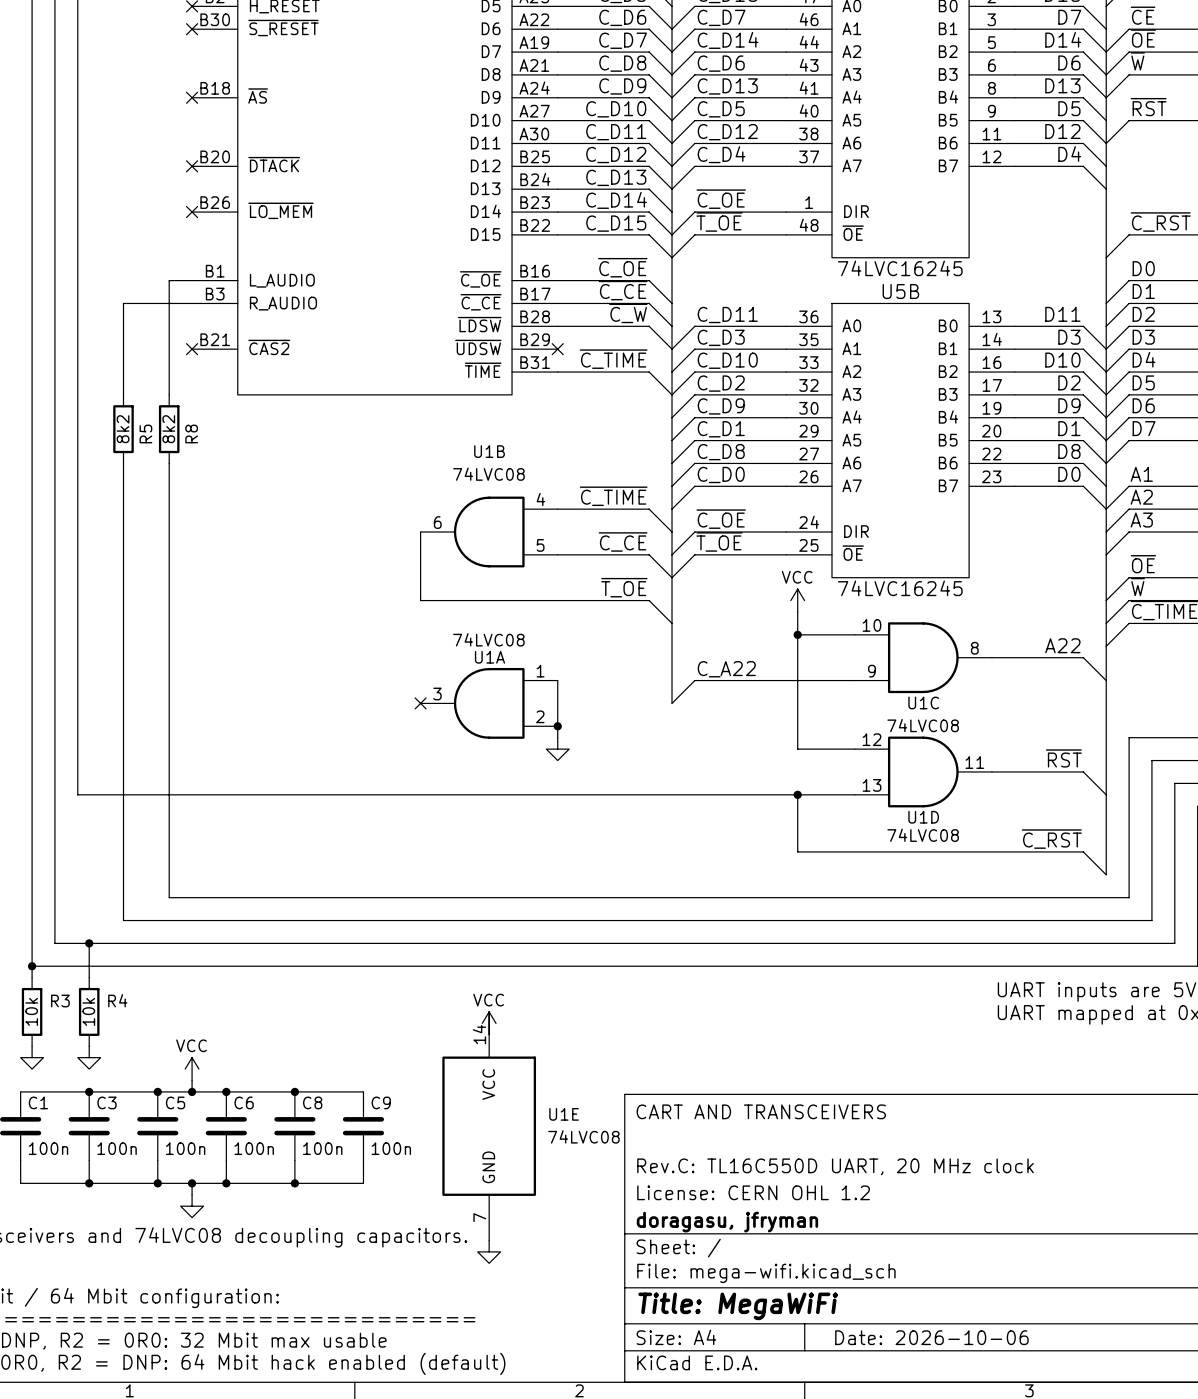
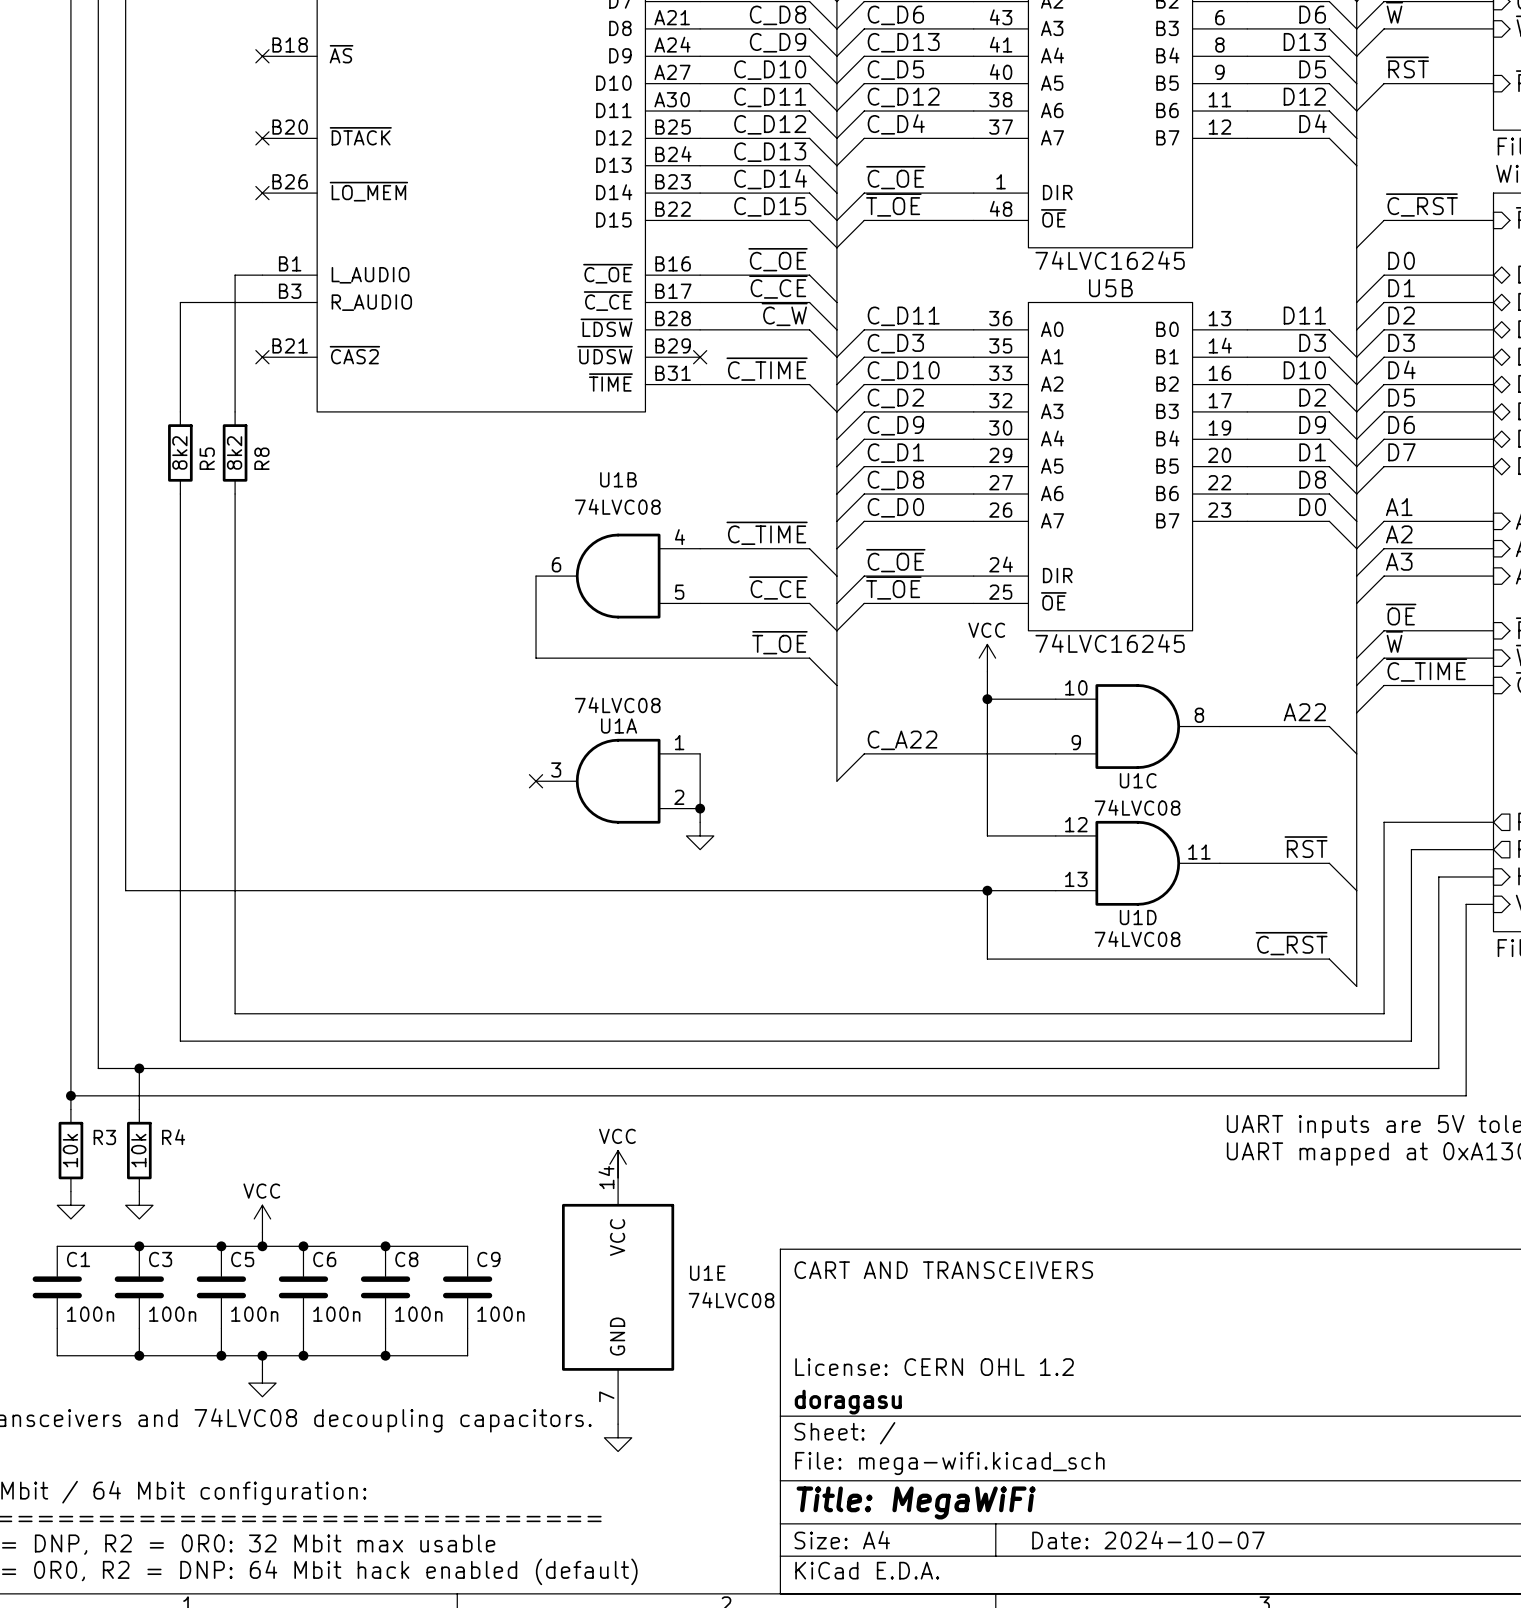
title block: Rev.C: TL16C550D UART, 20 MHz clock (835, 1166) -> none
title block: doragasu, jfryman (727, 1222) -> doragasu (848, 1402)
title block: Date: 2026-10-06 (931, 1337) -> Date: 2024-10-07 (1148, 1540)

